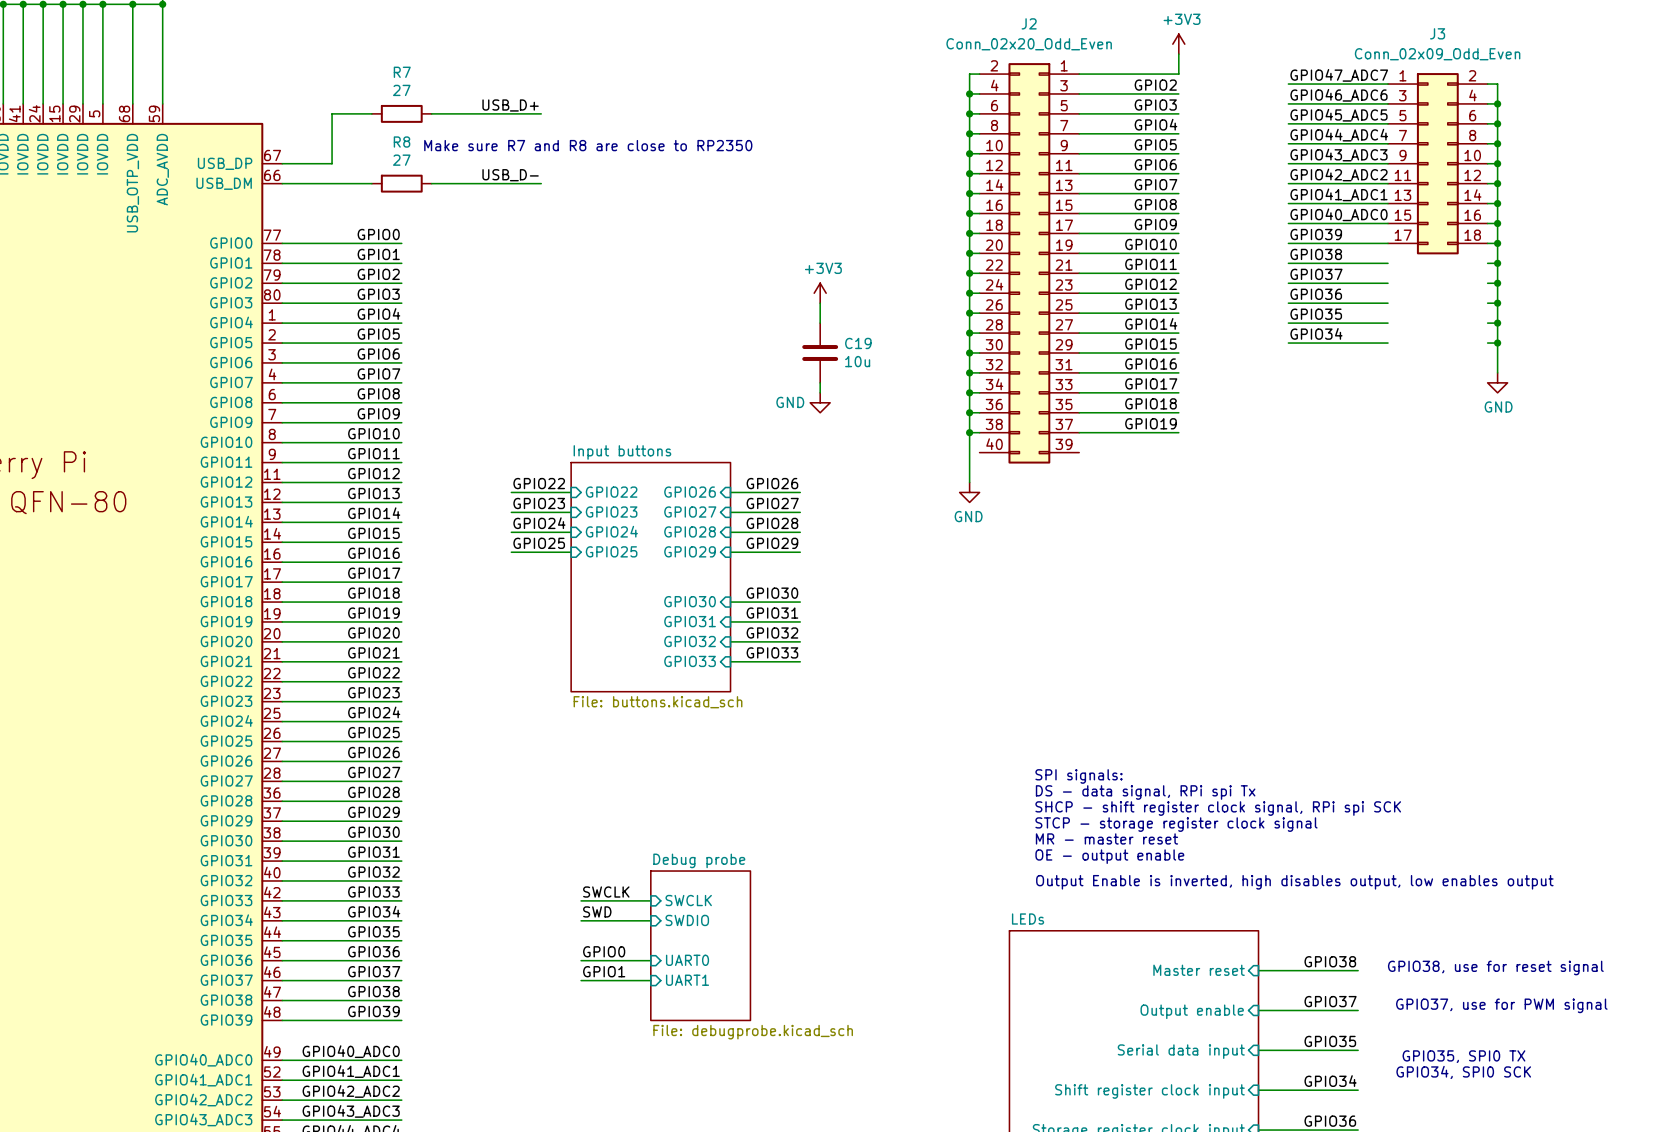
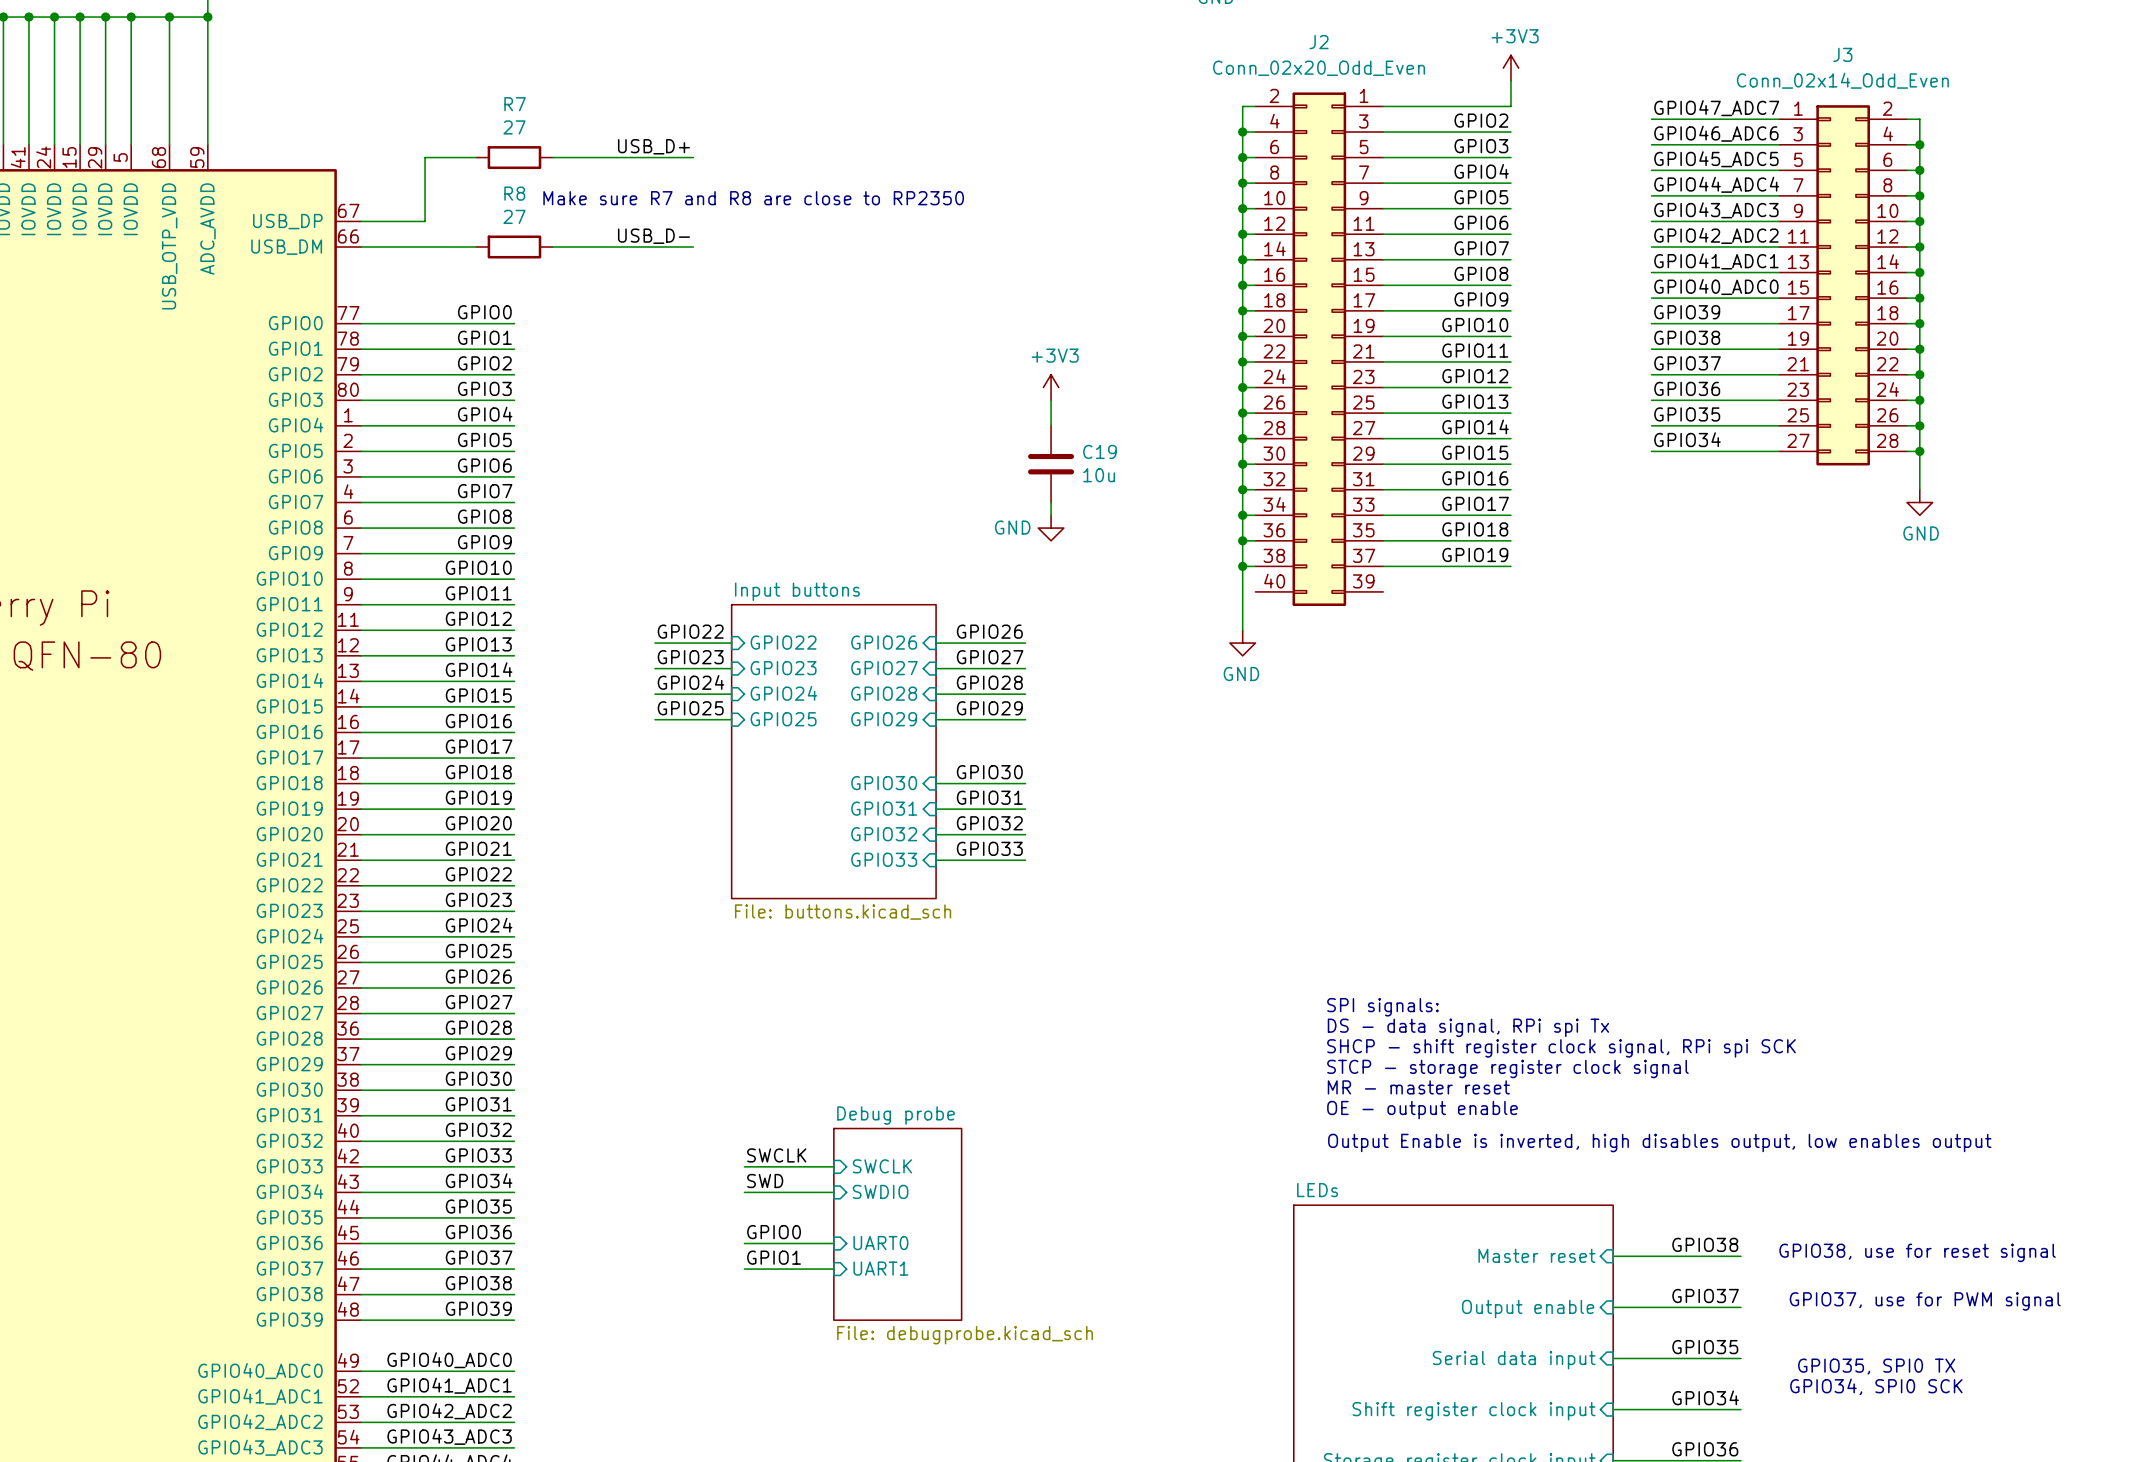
J3 value: Conn_02x09_Odd_Even (1437, 54) -> Conn_02x14_Odd_Even (1842, 80)
J3 symbol: [1388, 73, 1488, 255] -> [1779, 105, 1908, 466]

